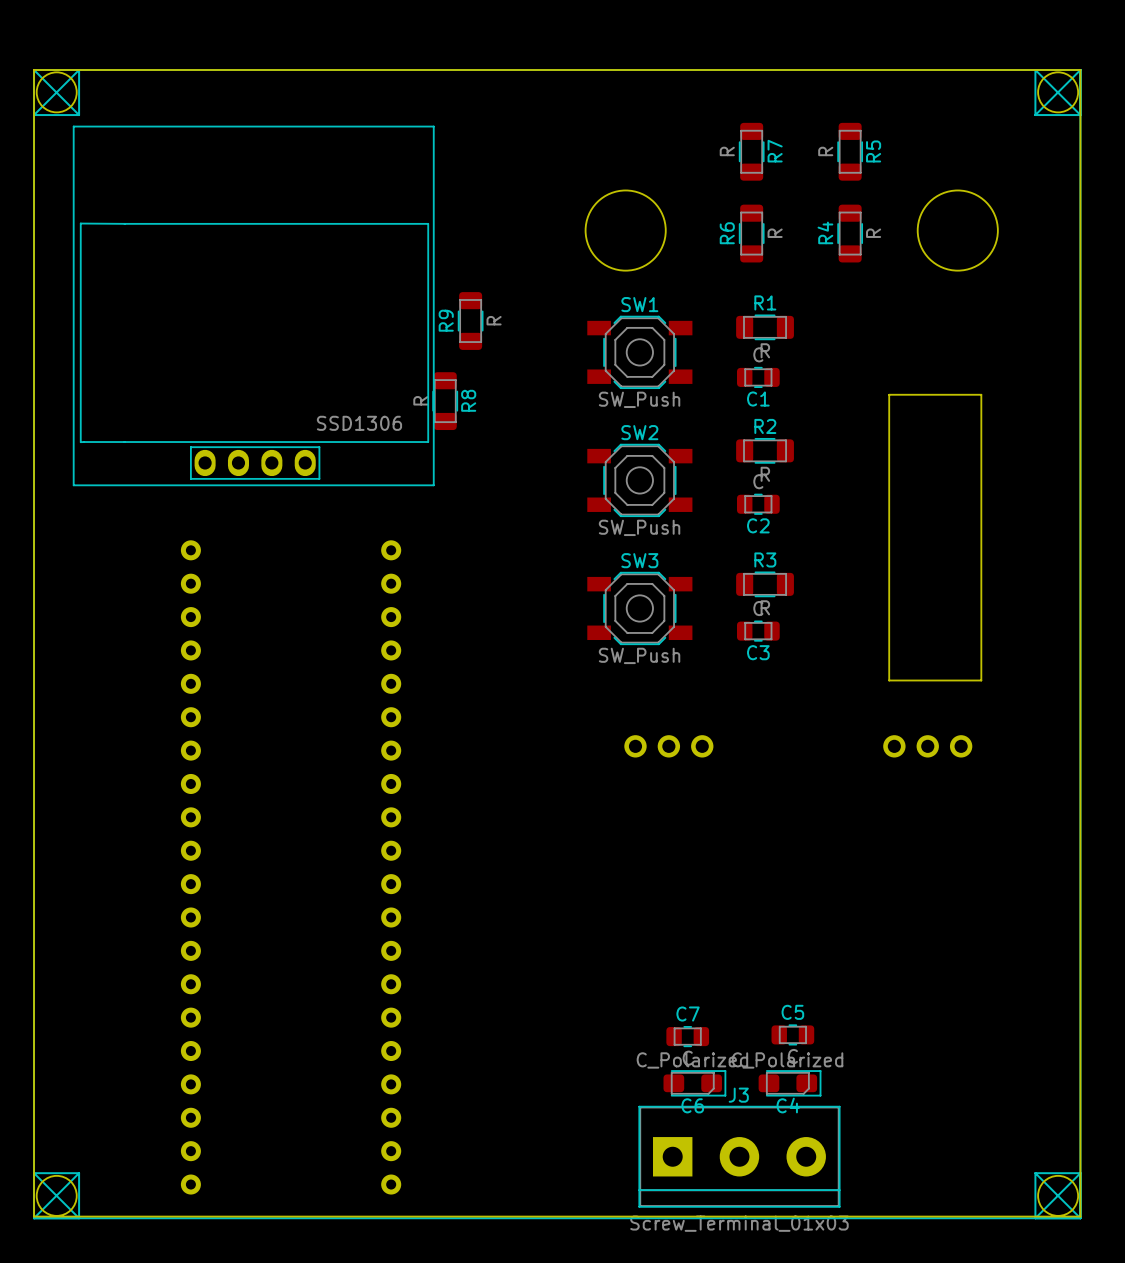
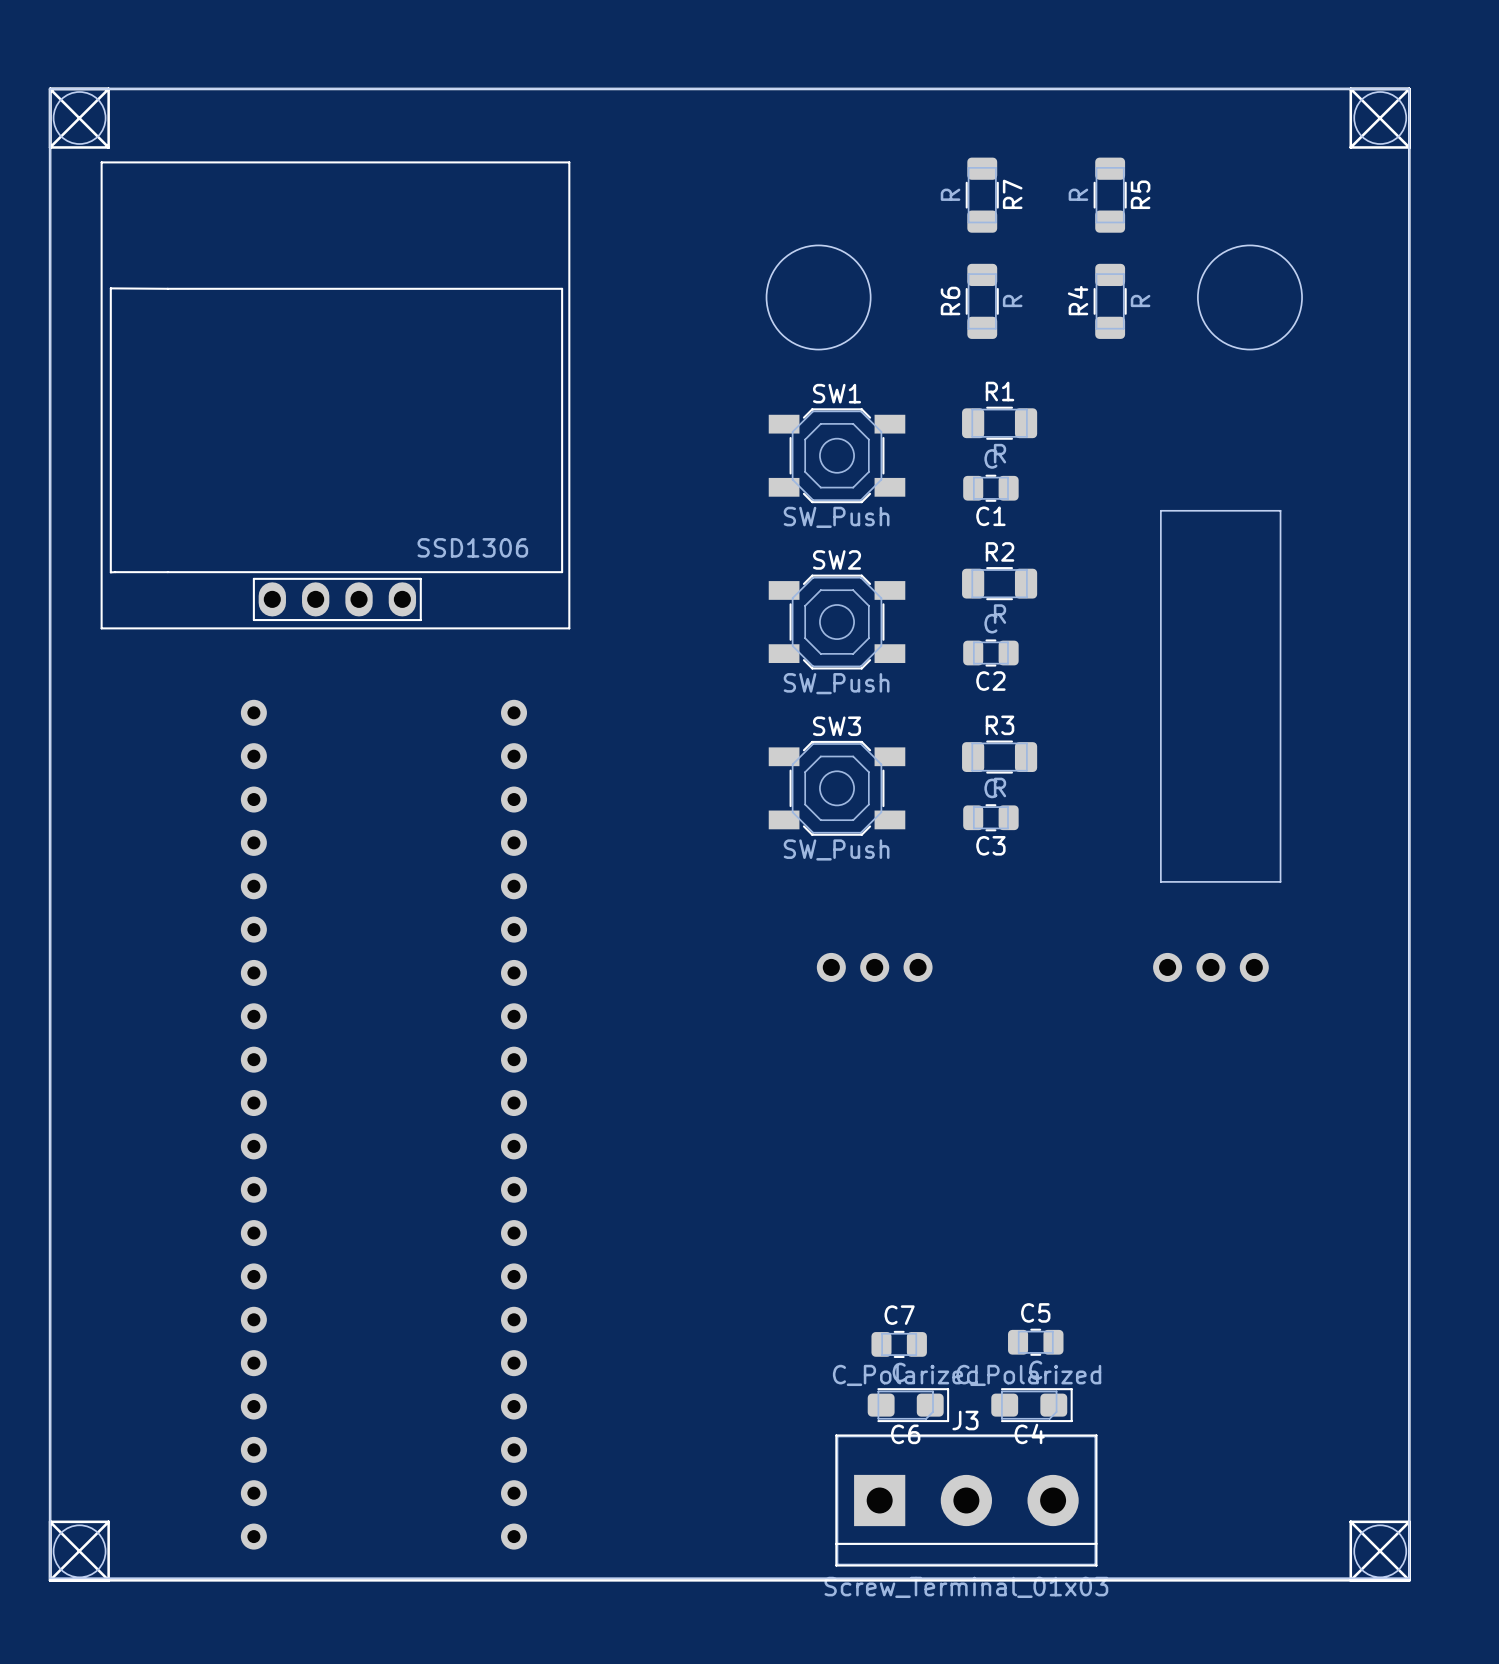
R9: R (470, 321) -> none
R8: R (445, 401) -> none

